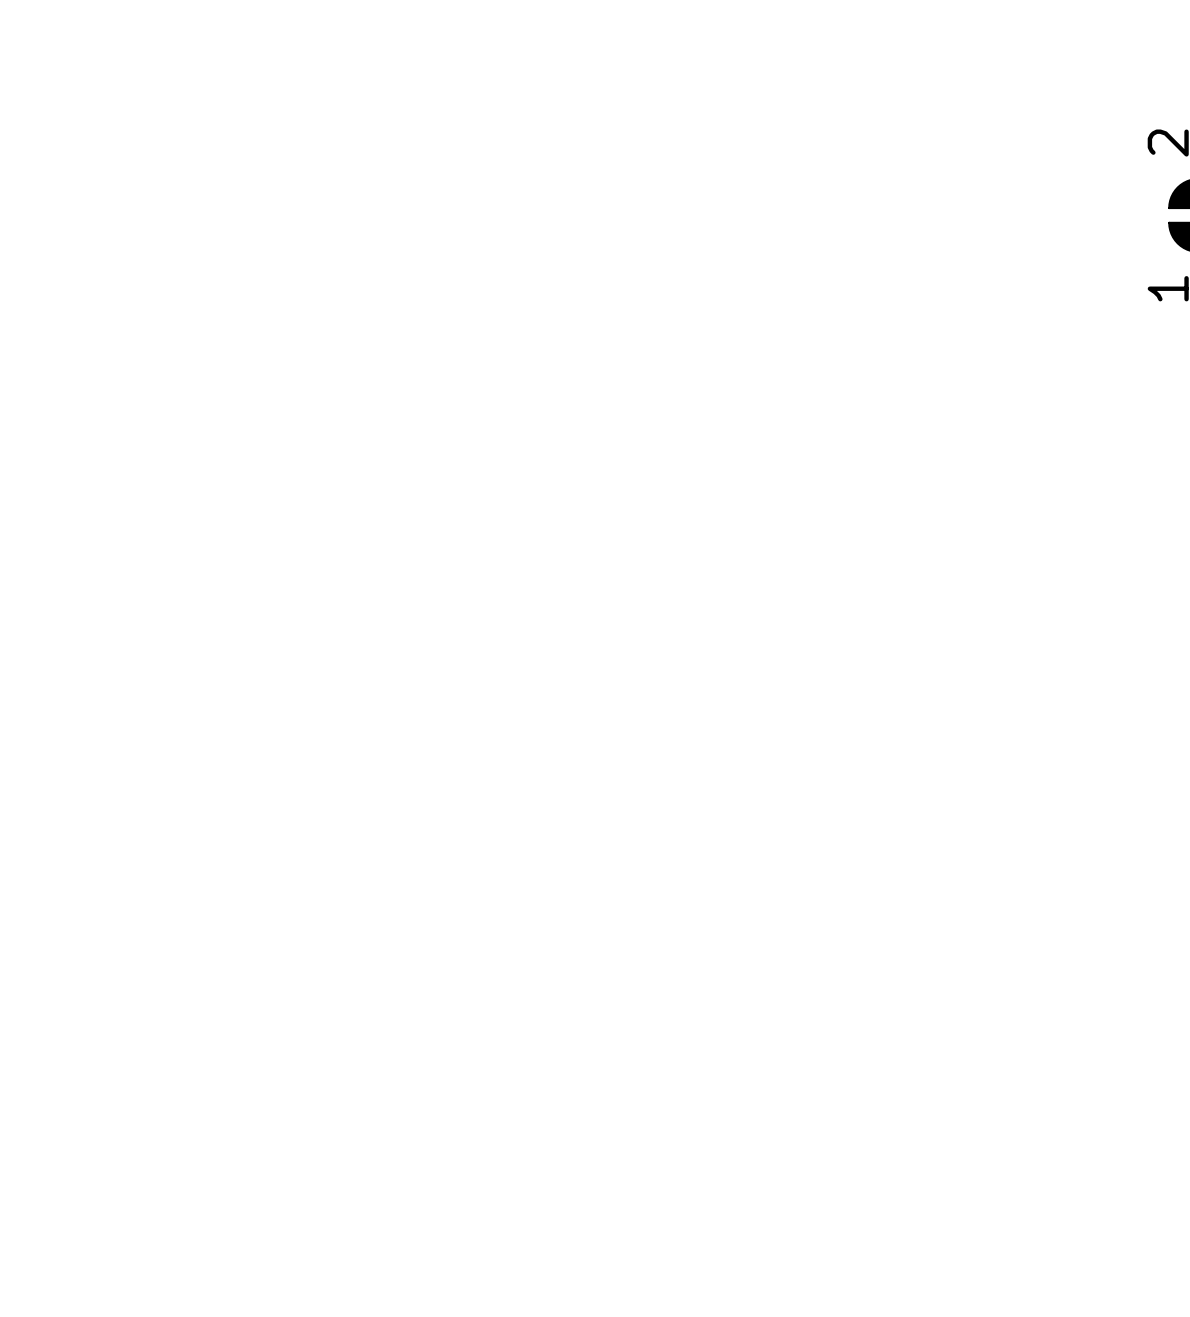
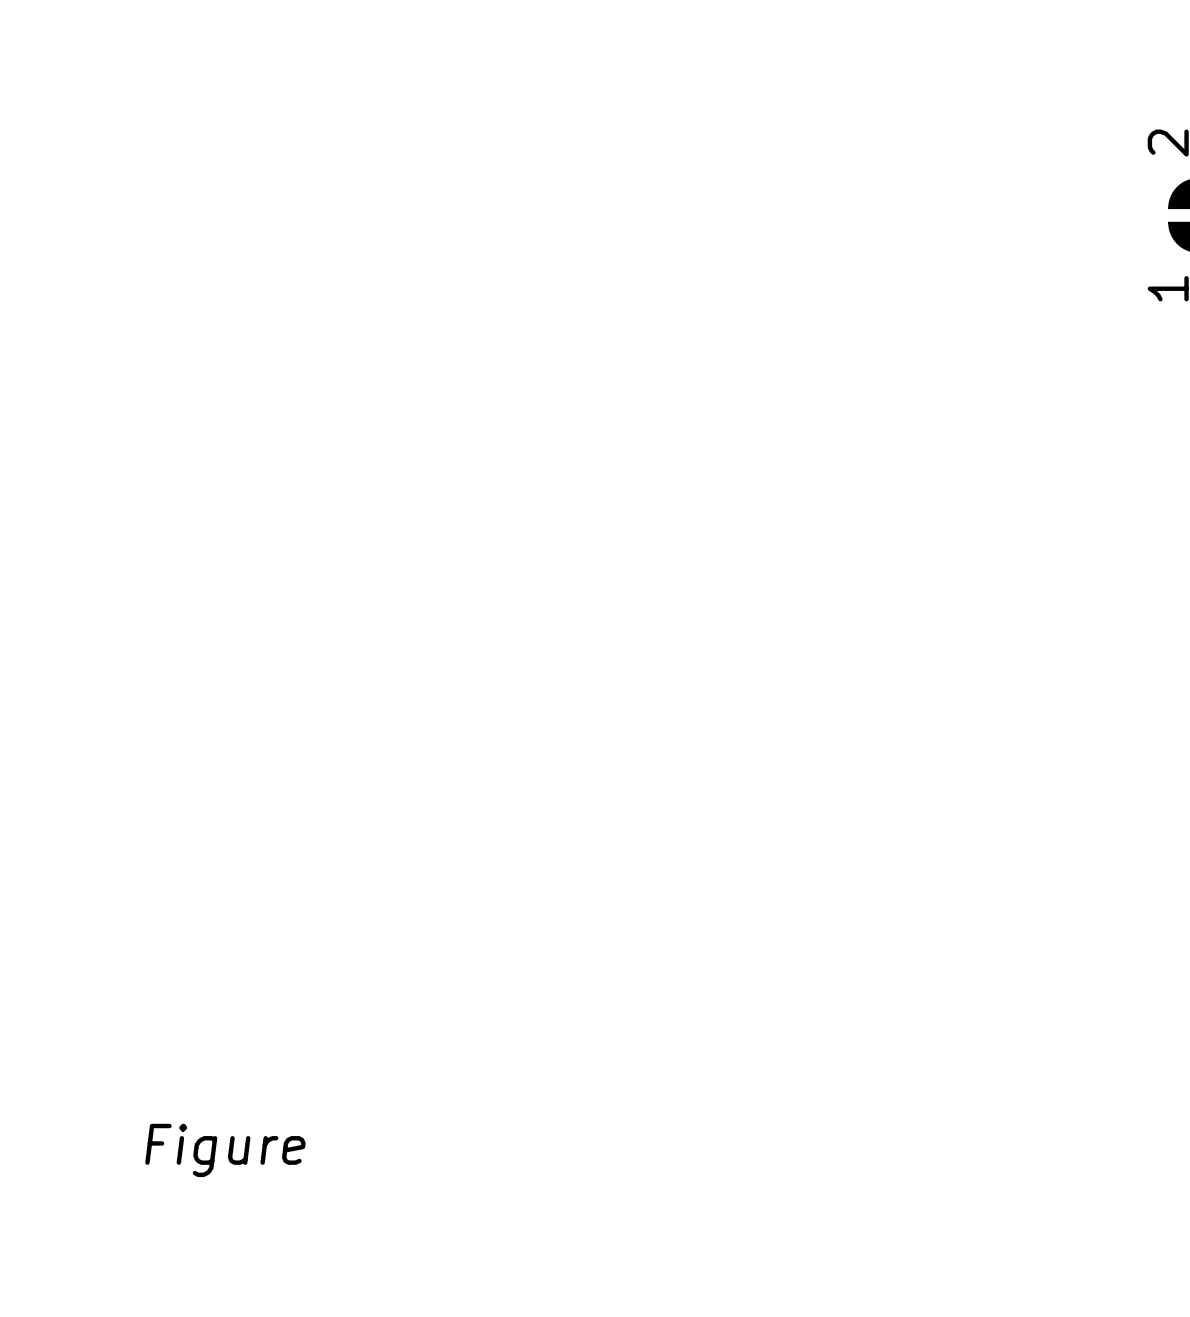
text: none -> Figure (225, 1150)

